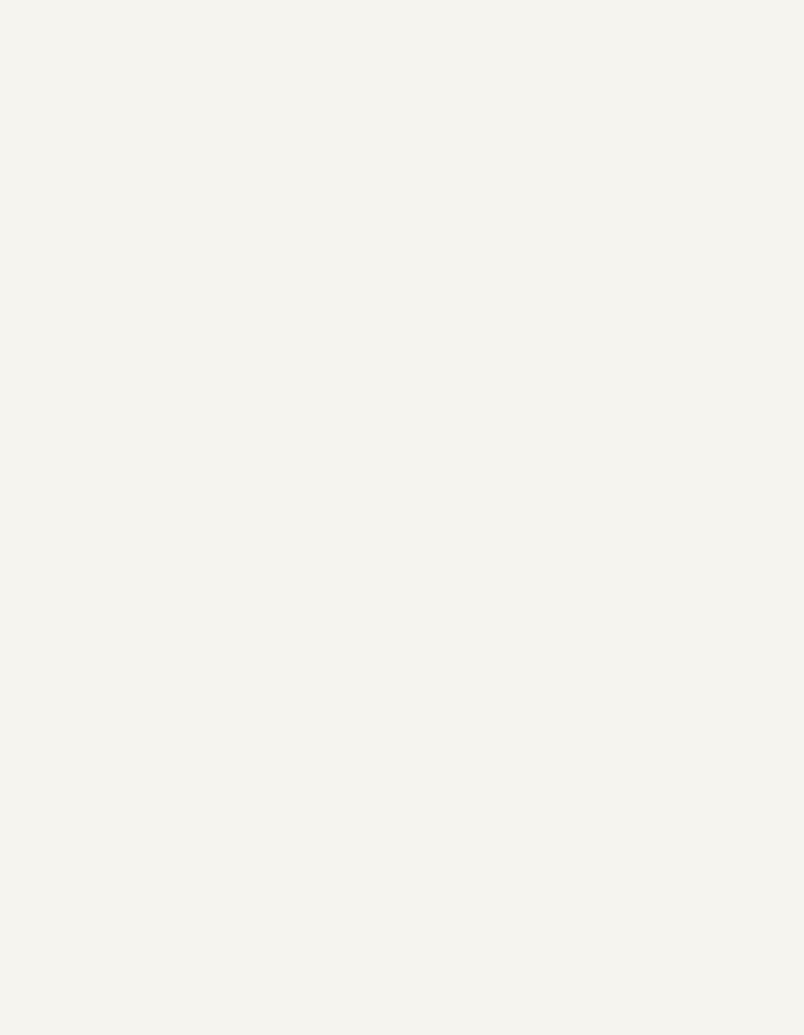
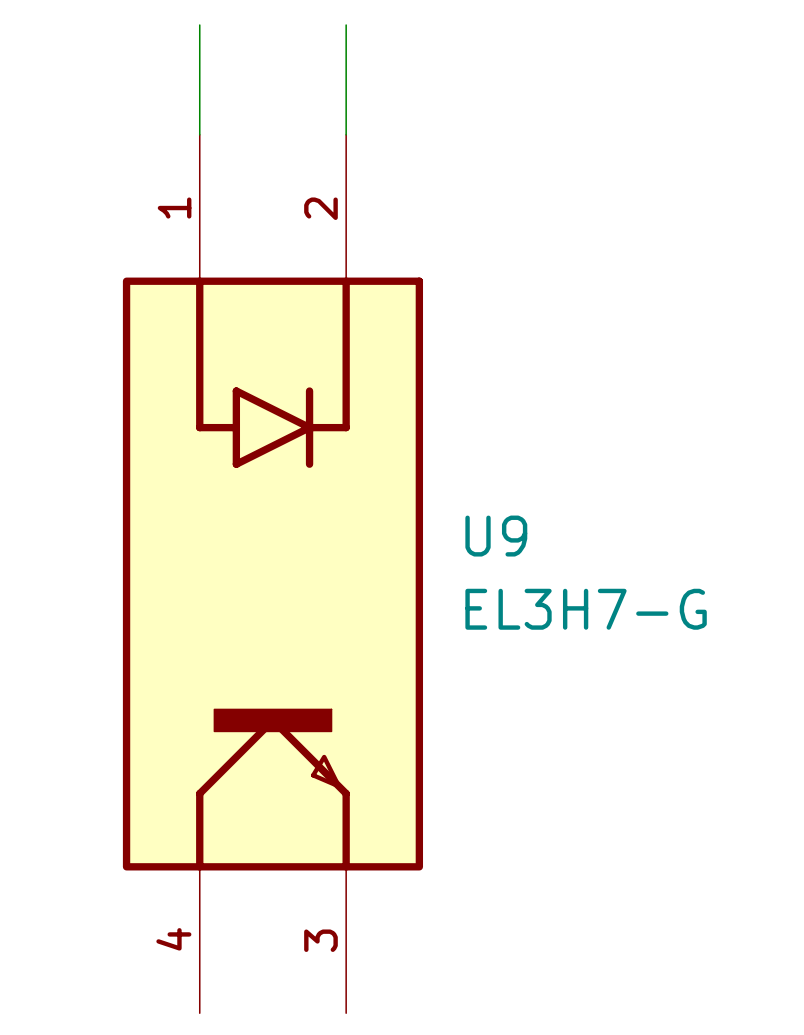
wire: none -> (199, 25) (199, 134)
wire: none -> (346, 25) (346, 134)
U9: none -> EL3H7-G (272, 574)

